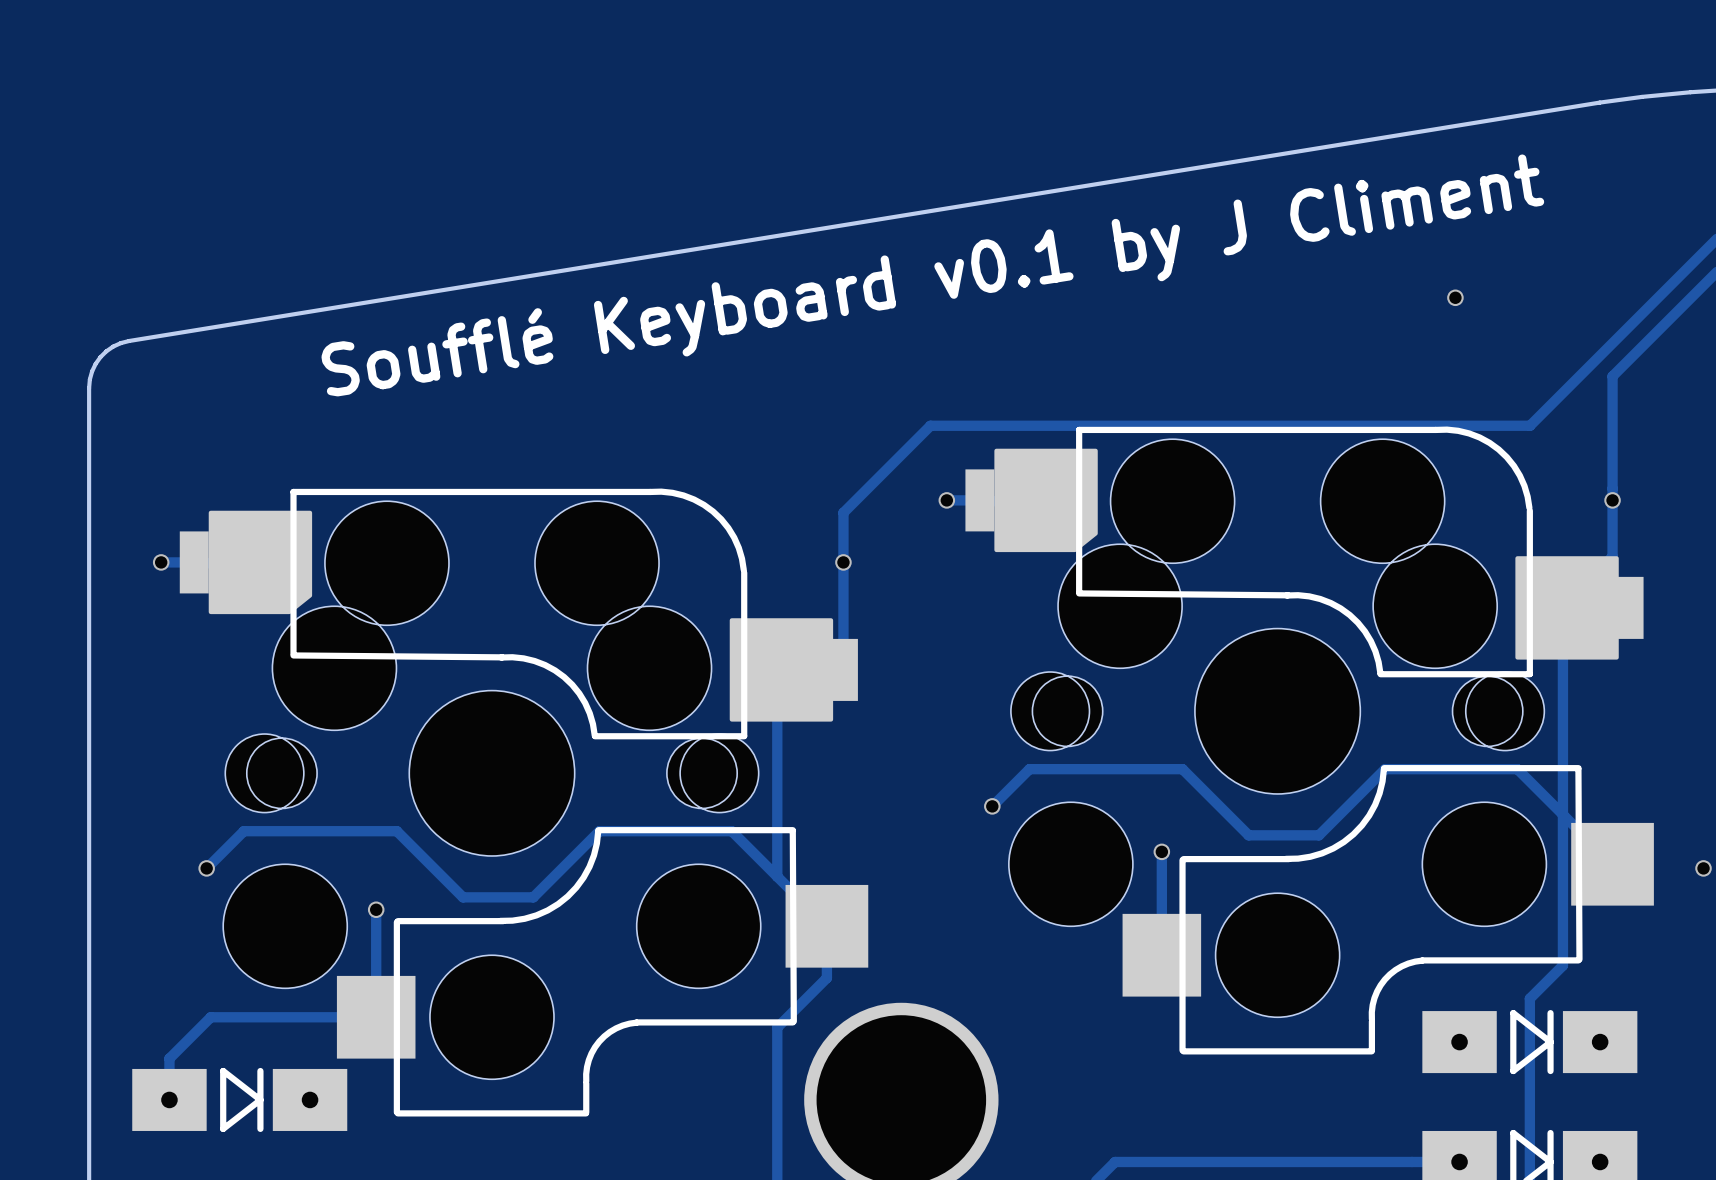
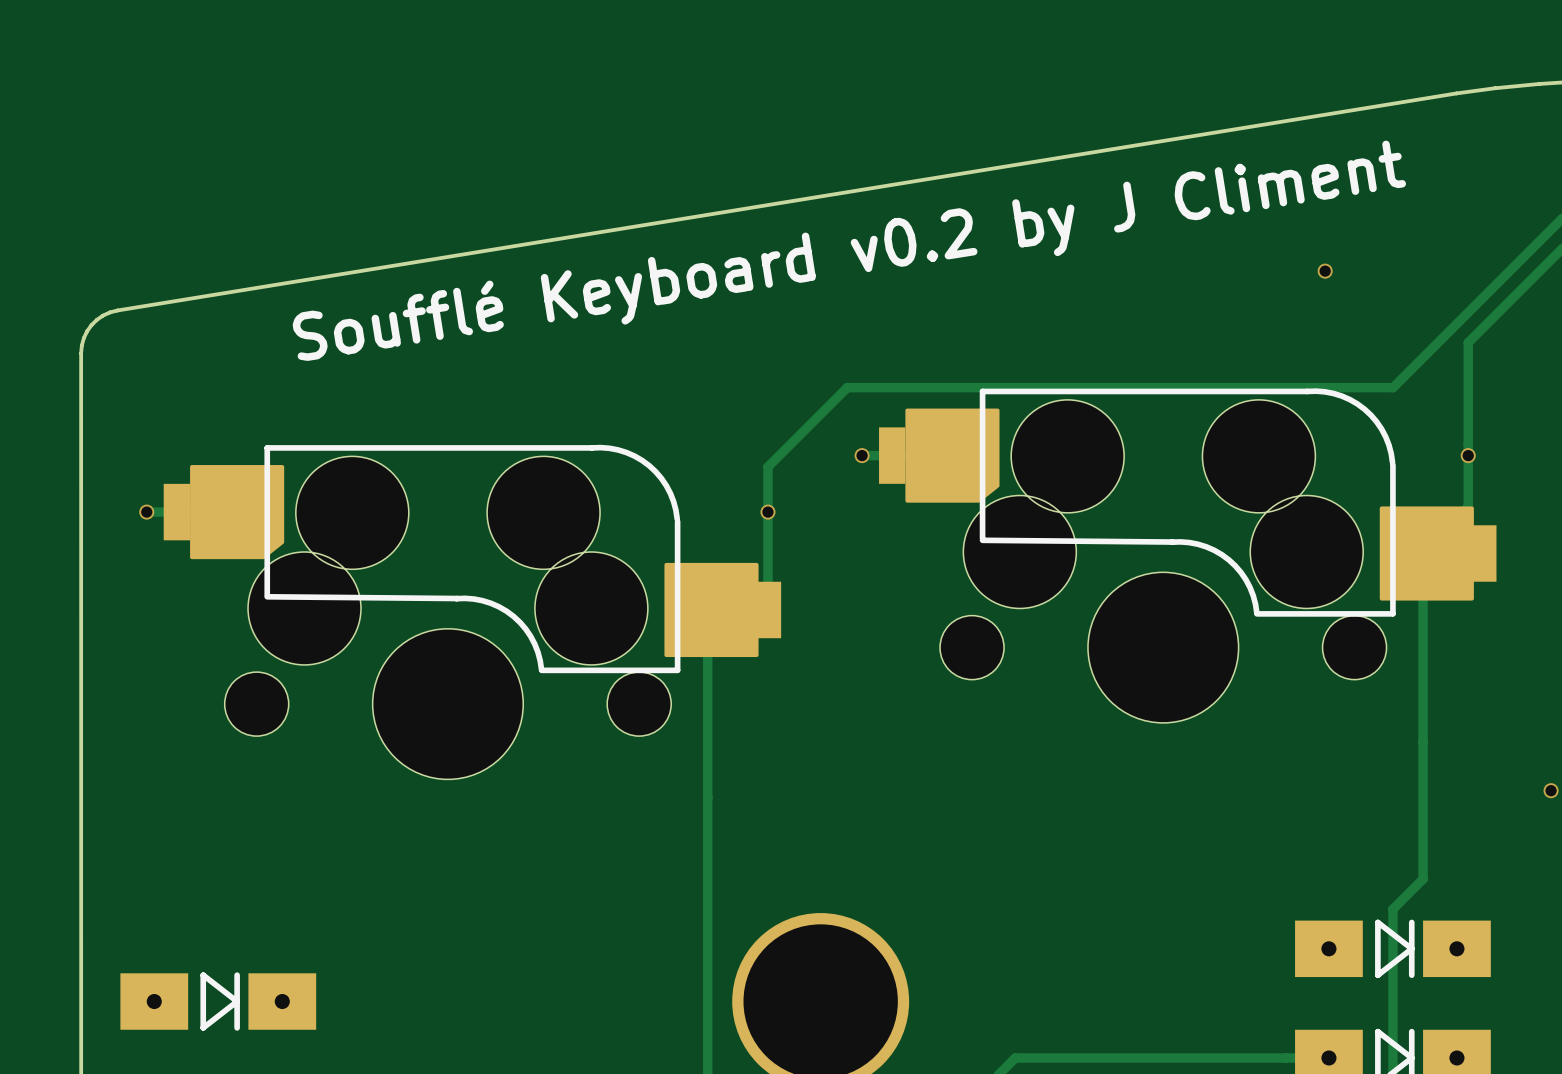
text: Soufflé Keyboard v0.1 by J Climent (932, 275) -> Soufflé Keyboard v0.2 by J Climent (849, 250)
part: none -> (1187, 555)
part: none -> (472, 612)
part: (1309, 740) -> none
part: (524, 802) -> none
track: (992, 806) (1029, 769) (1182, 769) (1248, 835) (1318, 835) (1385, 769) (1517, 769) (1612, 864) -> none
via: (992, 806) -> none
track: (1161, 851) (1161, 955) -> none
via: (1161, 851) -> none
track: (206, 868) (243, 831) (396, 831) (463, 897) (533, 897) (599, 831) (731, 831) (826, 926) (826, 977) (777, 1027) -> (707, 798) (707, 935)
via: (206, 868) -> none
track: (376, 909) (376, 1017) (210, 1017) (169, 1058) (169, 1099) -> none
via: (376, 909) -> none

